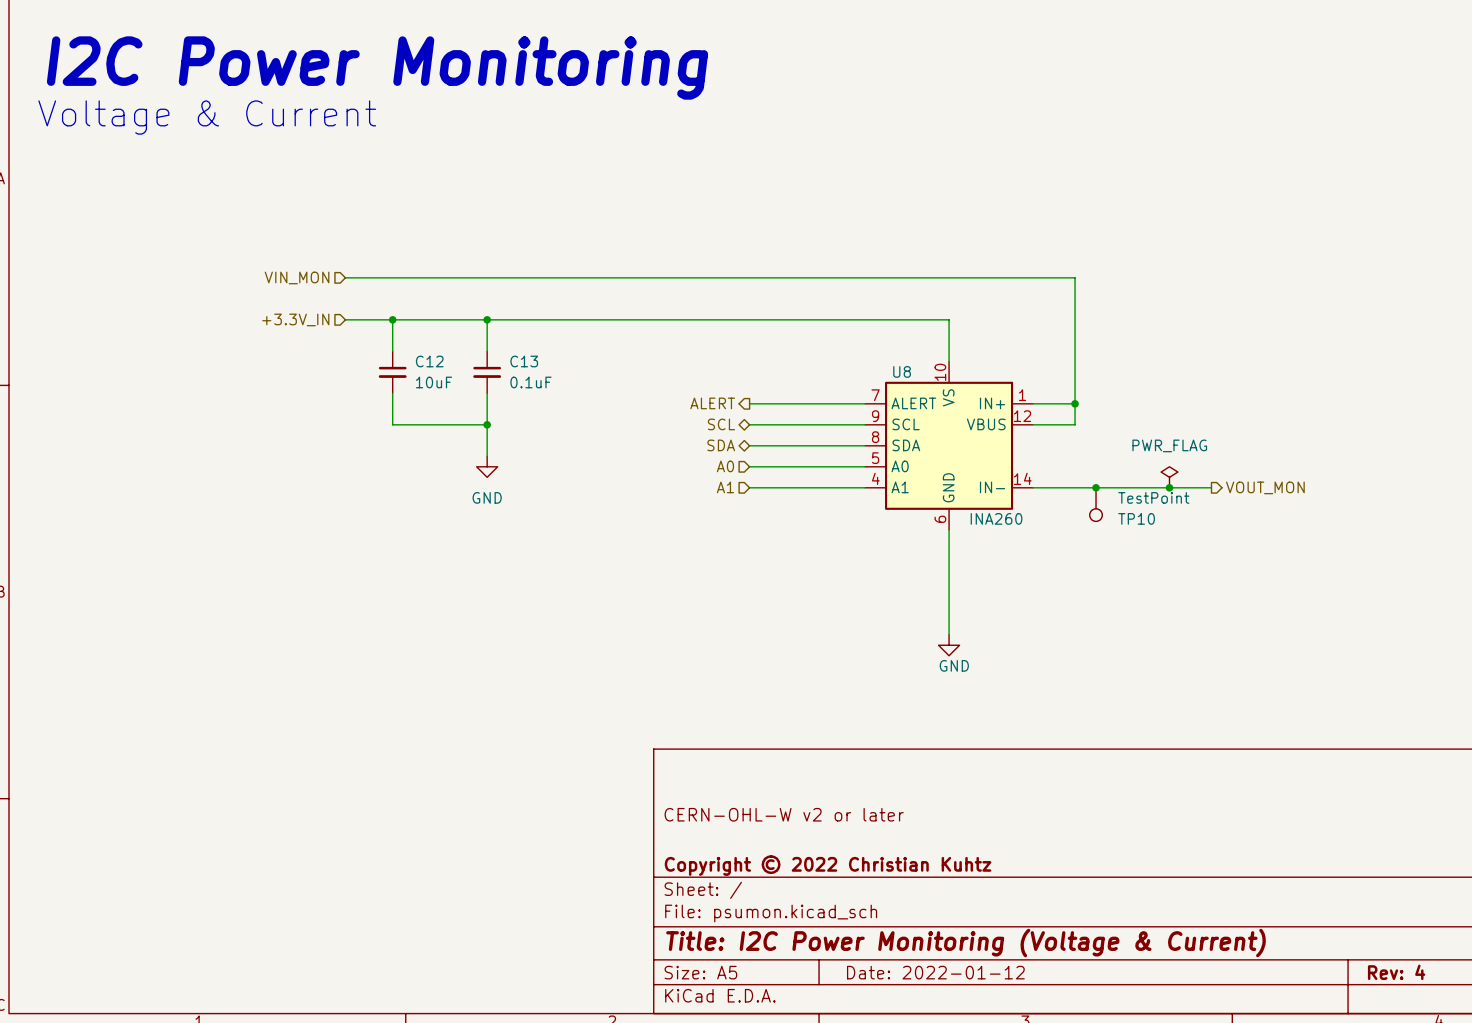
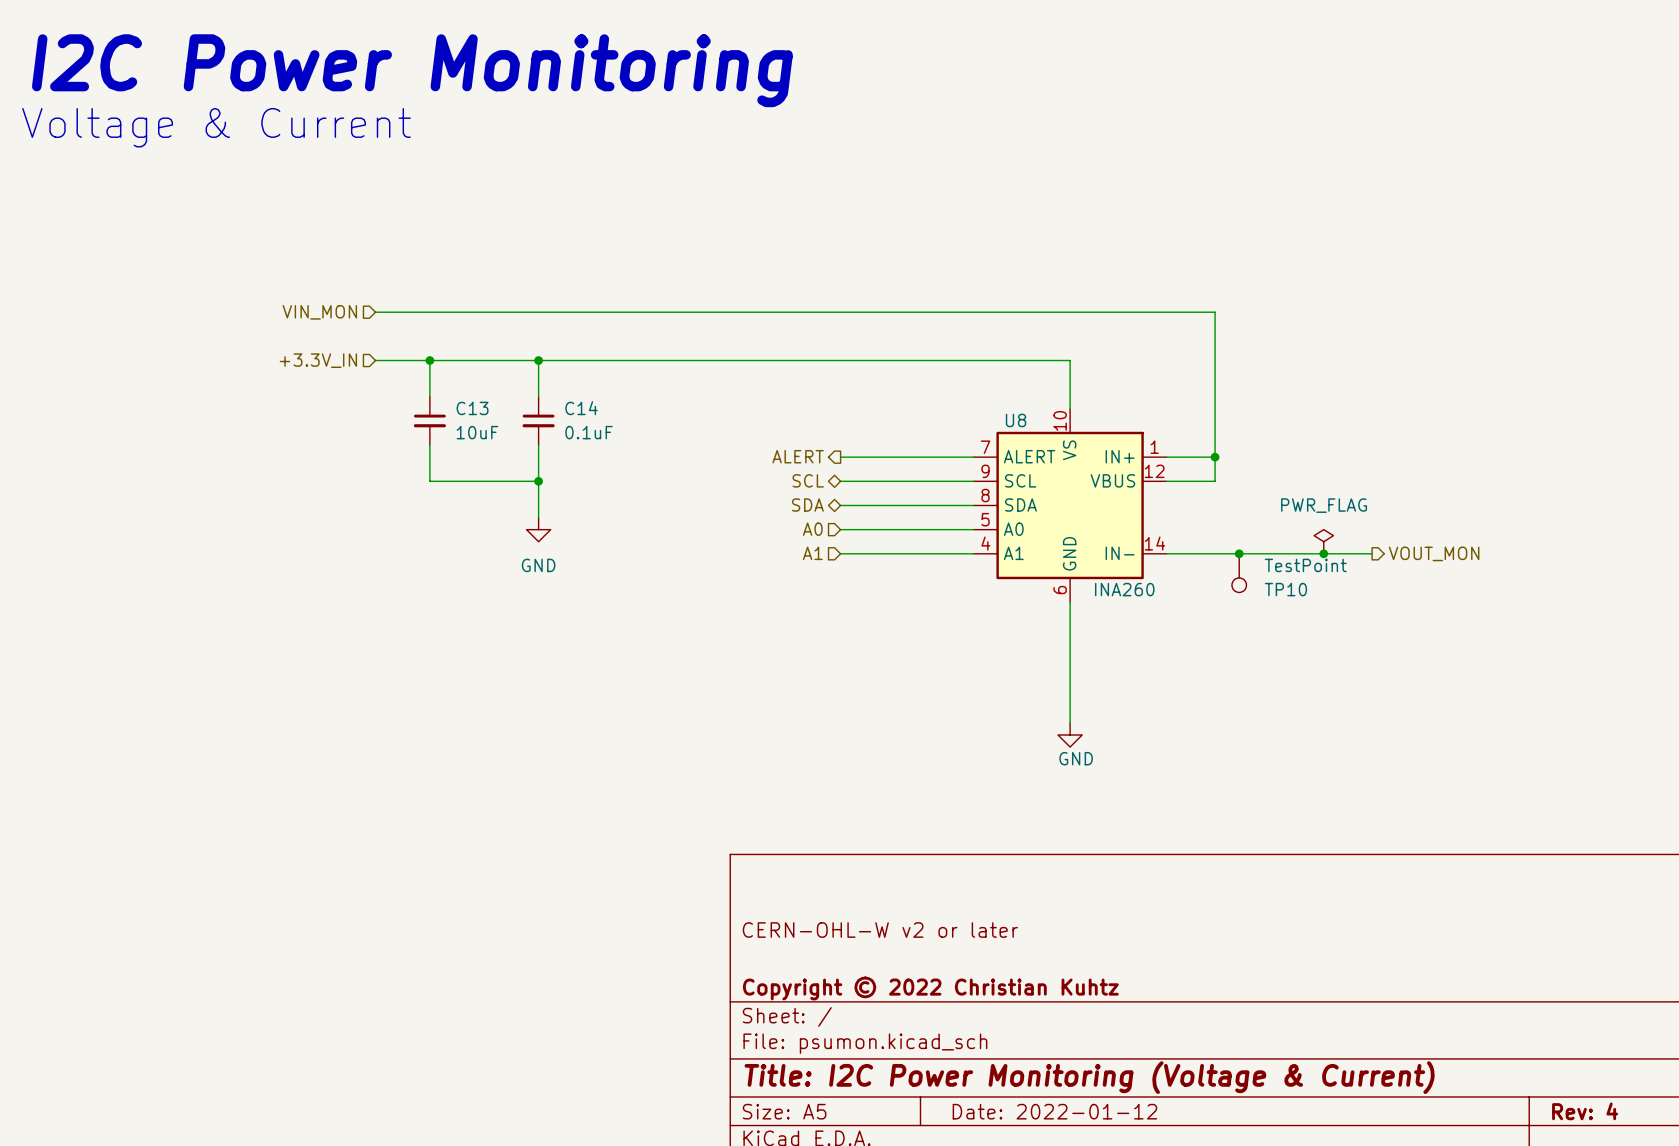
C12 name: C12 (429, 361) -> C13 (472, 408)
C13 name: C13 (524, 361) -> C14 (581, 408)

